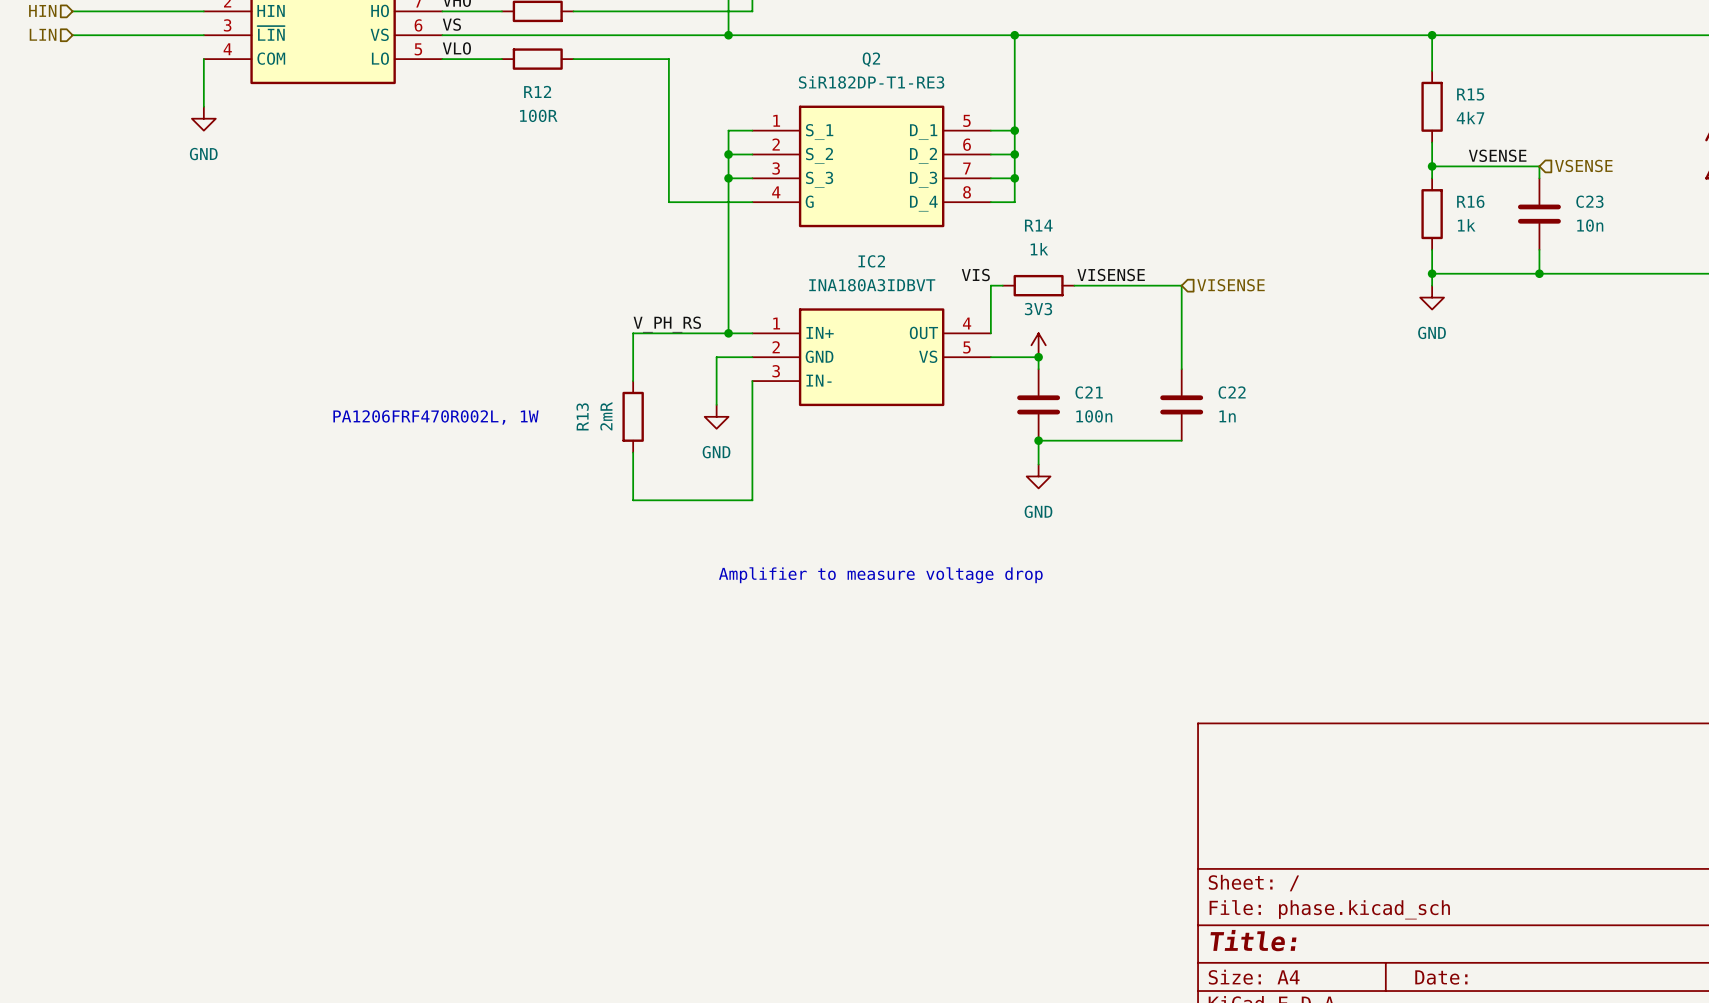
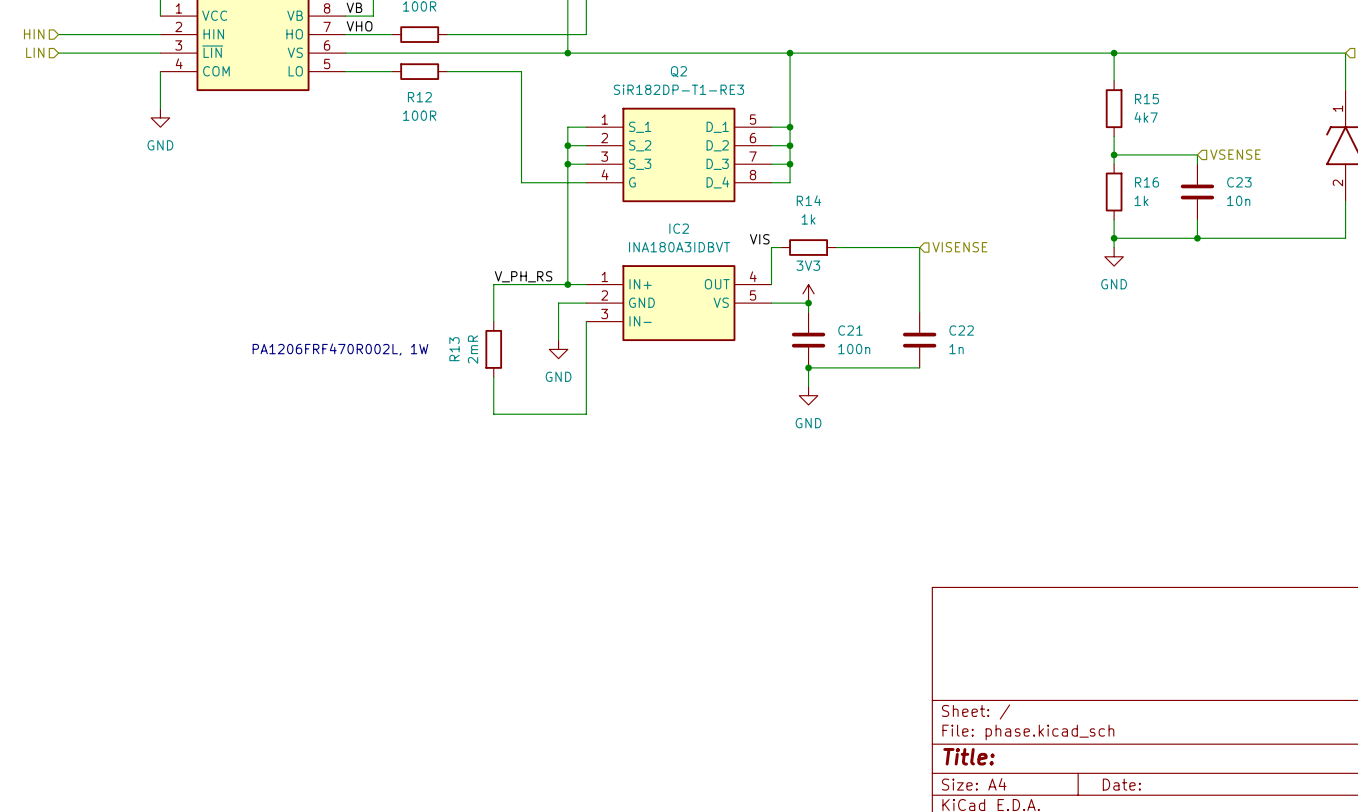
label: VS (451, 24) -> none
label: VLO (456, 48) -> none
label: VSENSE (1497, 155) -> none
label: VISENSE (1111, 275) -> none
text: Amplifier to measure voltage drop (880, 575) -> none

